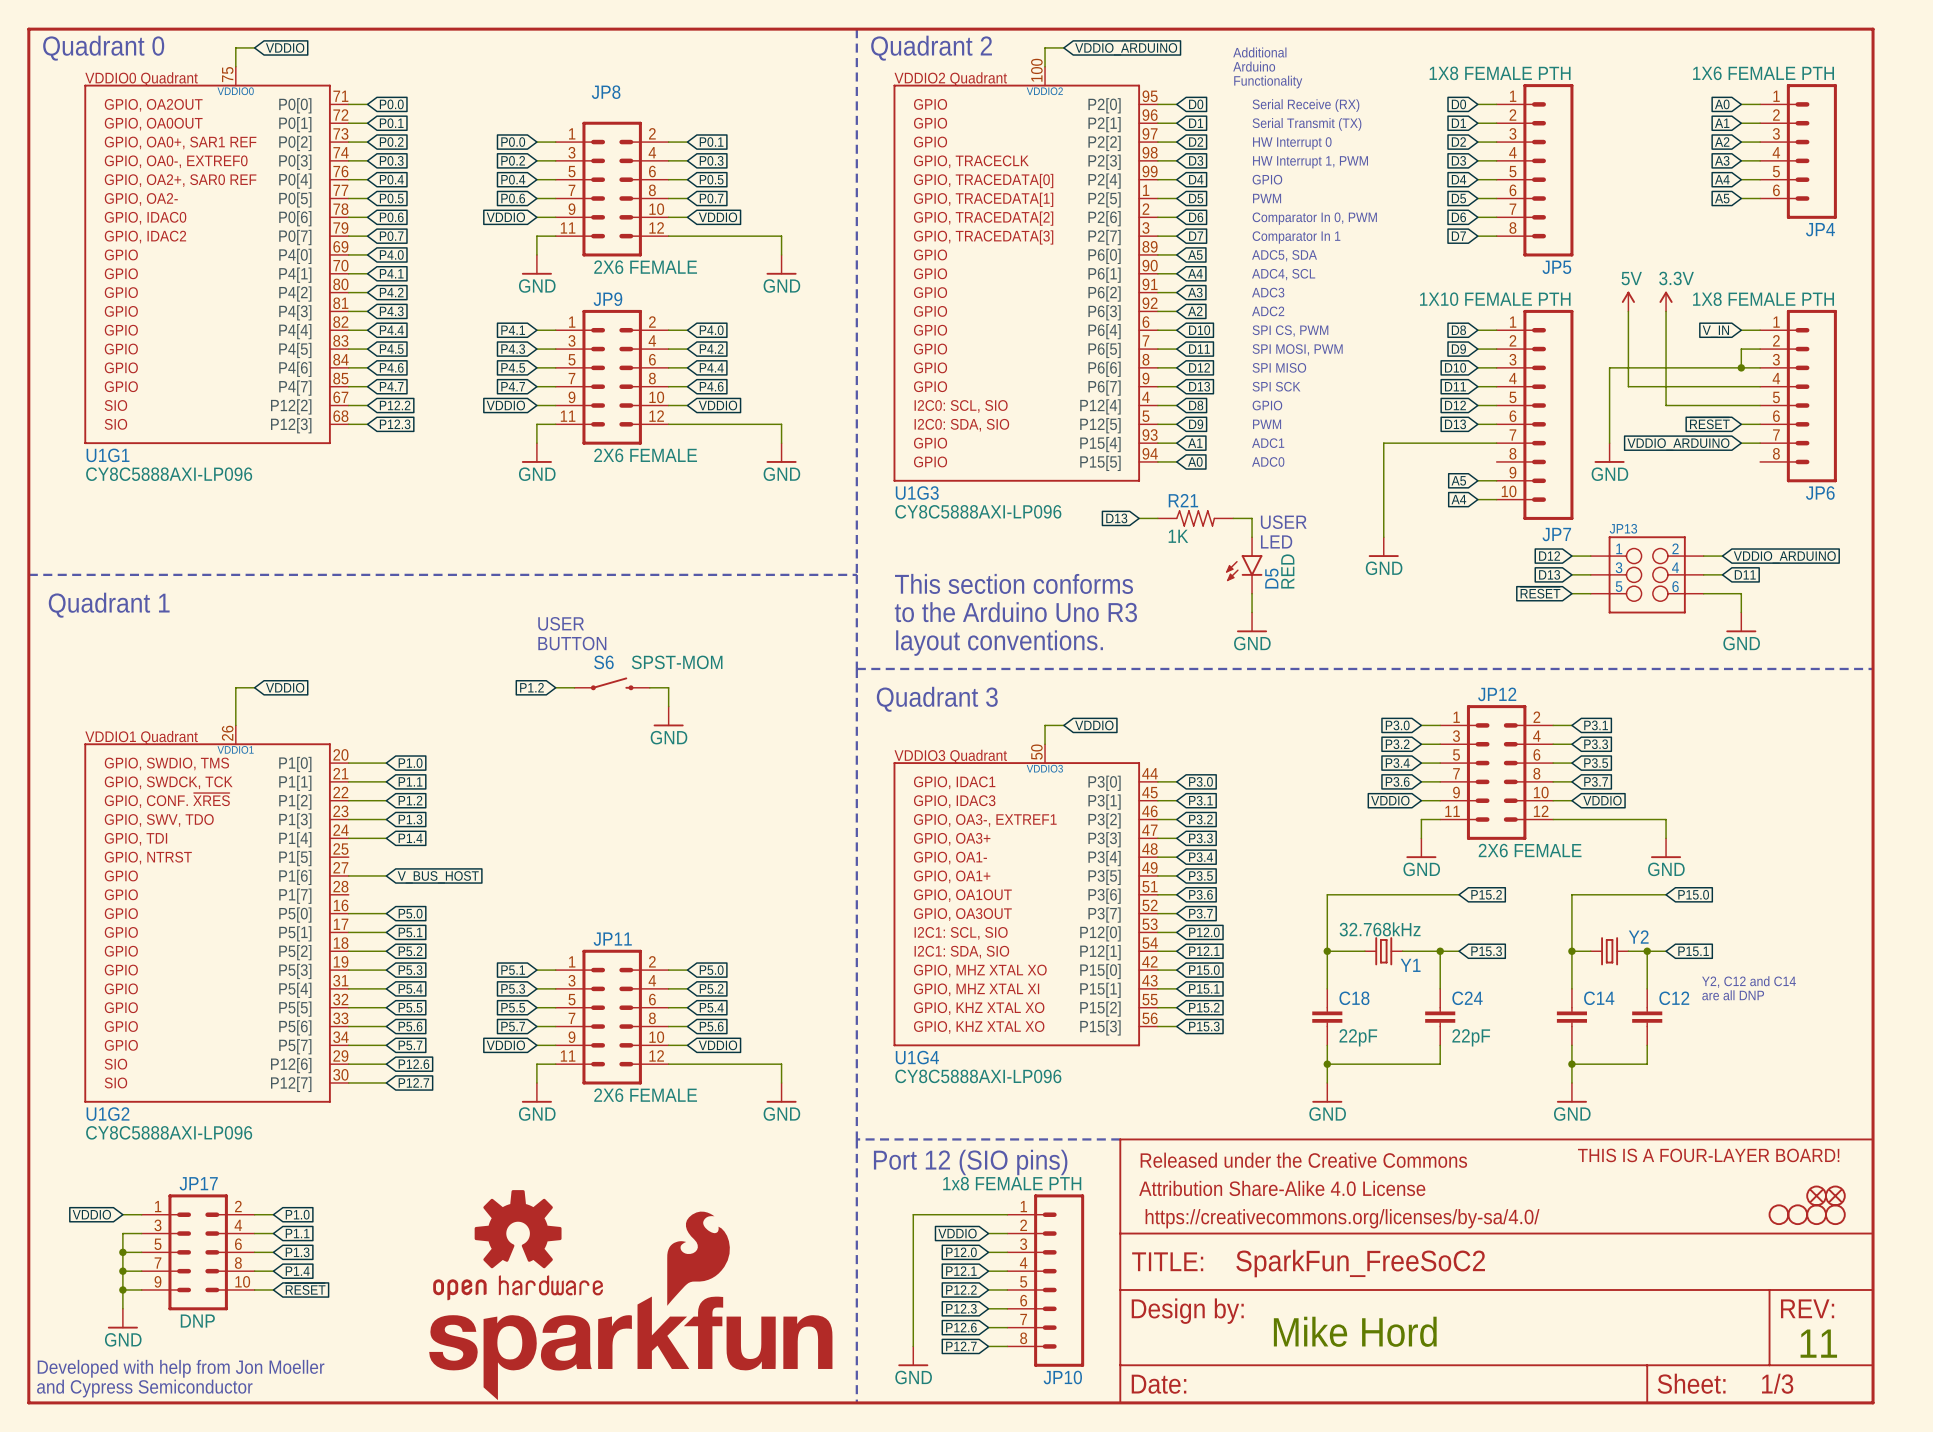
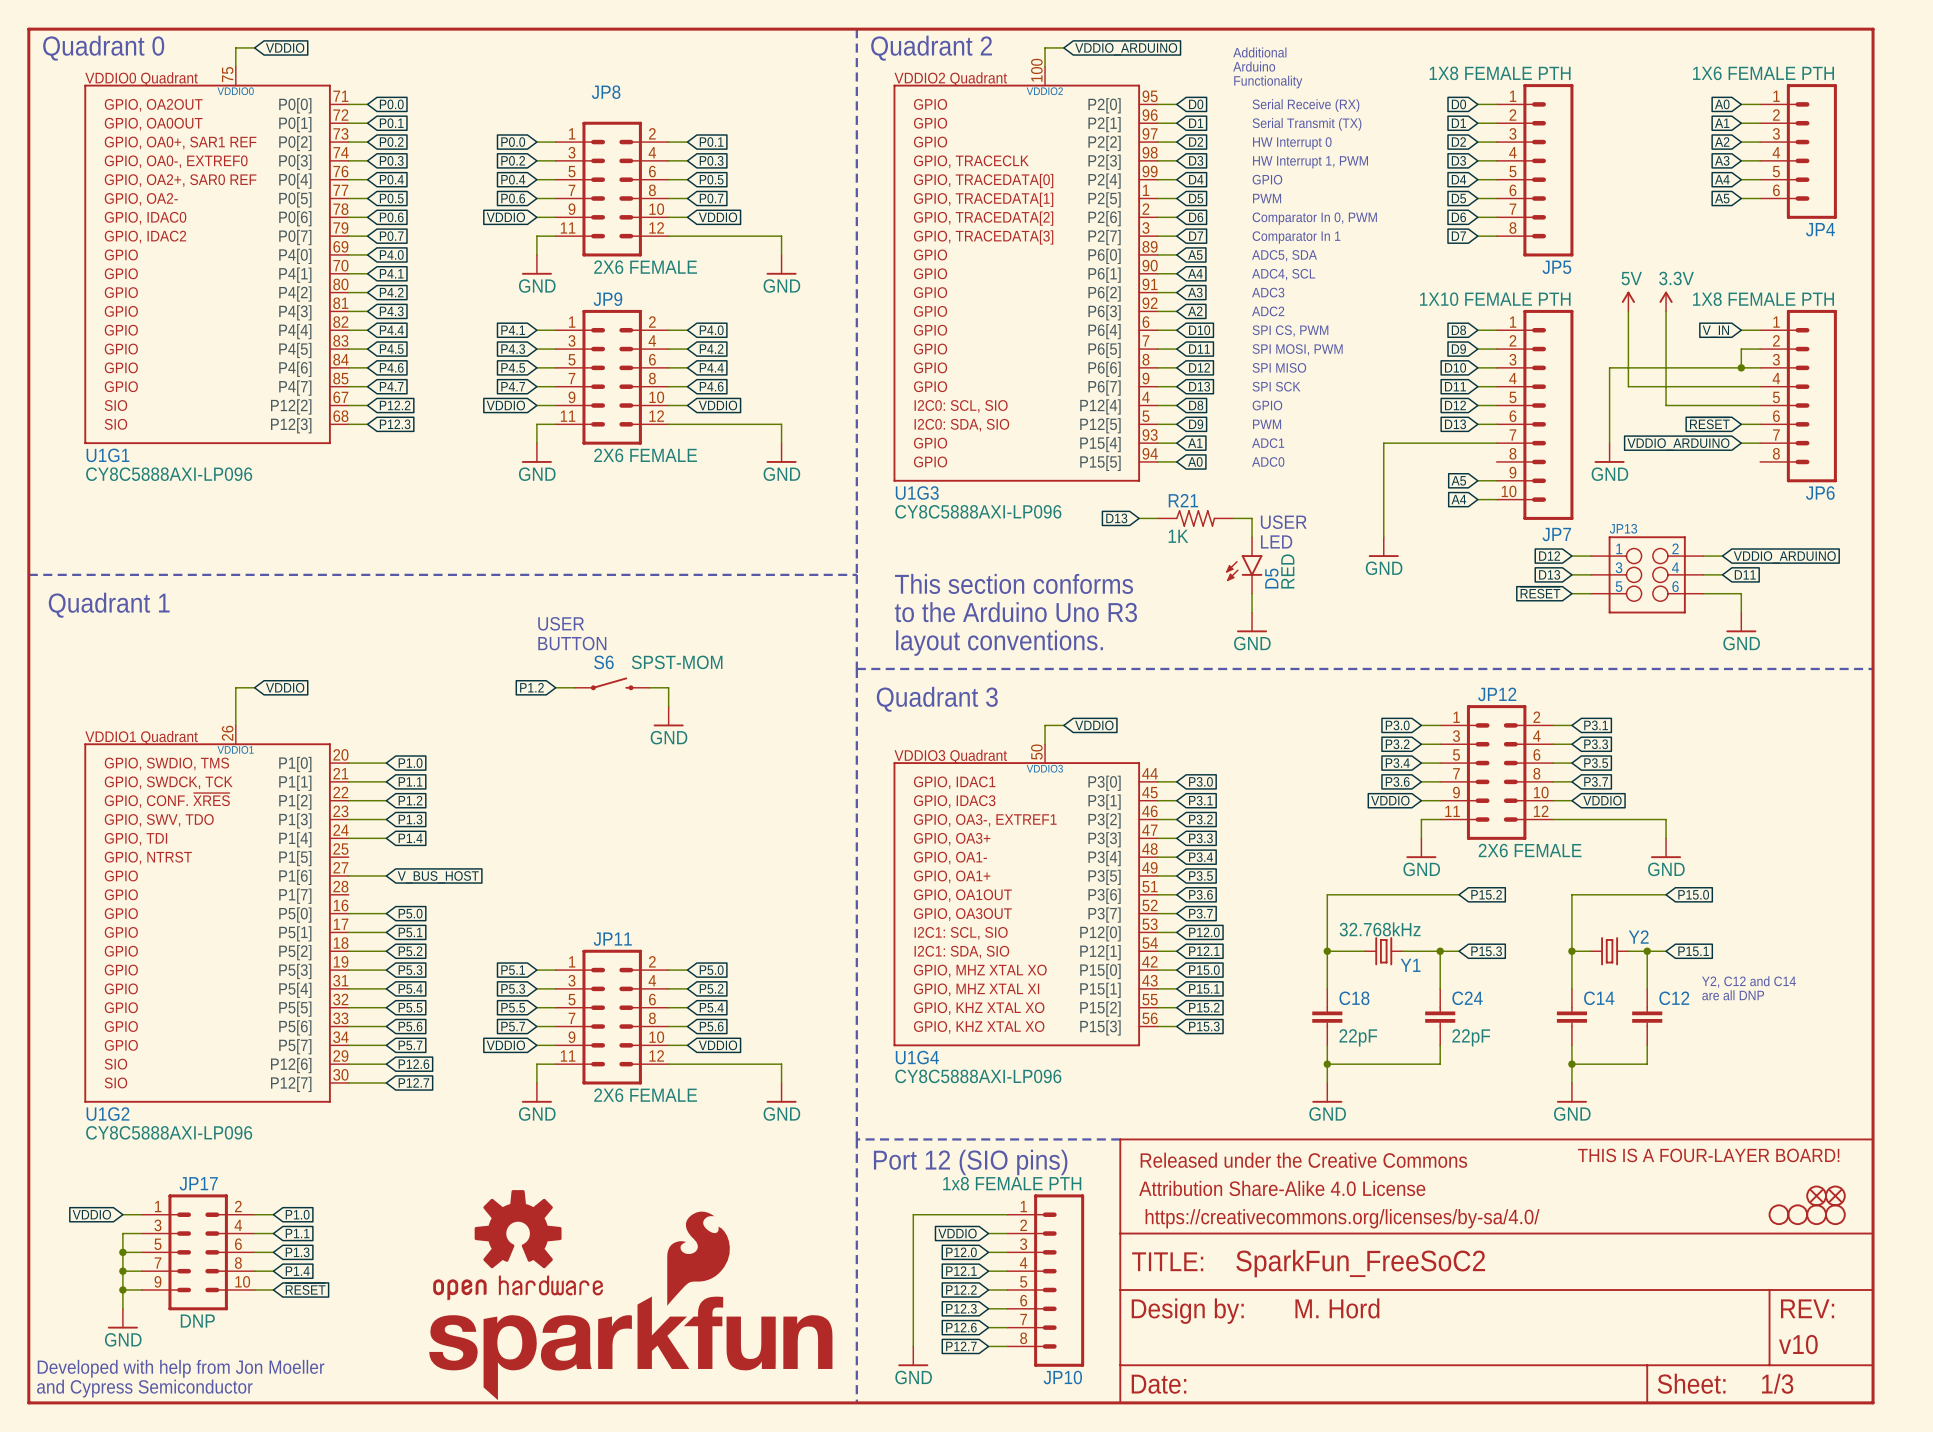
part text: none -> M. Hord (1337, 1308)
text: Mike Hord (1355, 1331) -> none
text: 11 (1818, 1343) -> none
part text: none -> v10 (1798, 1344)

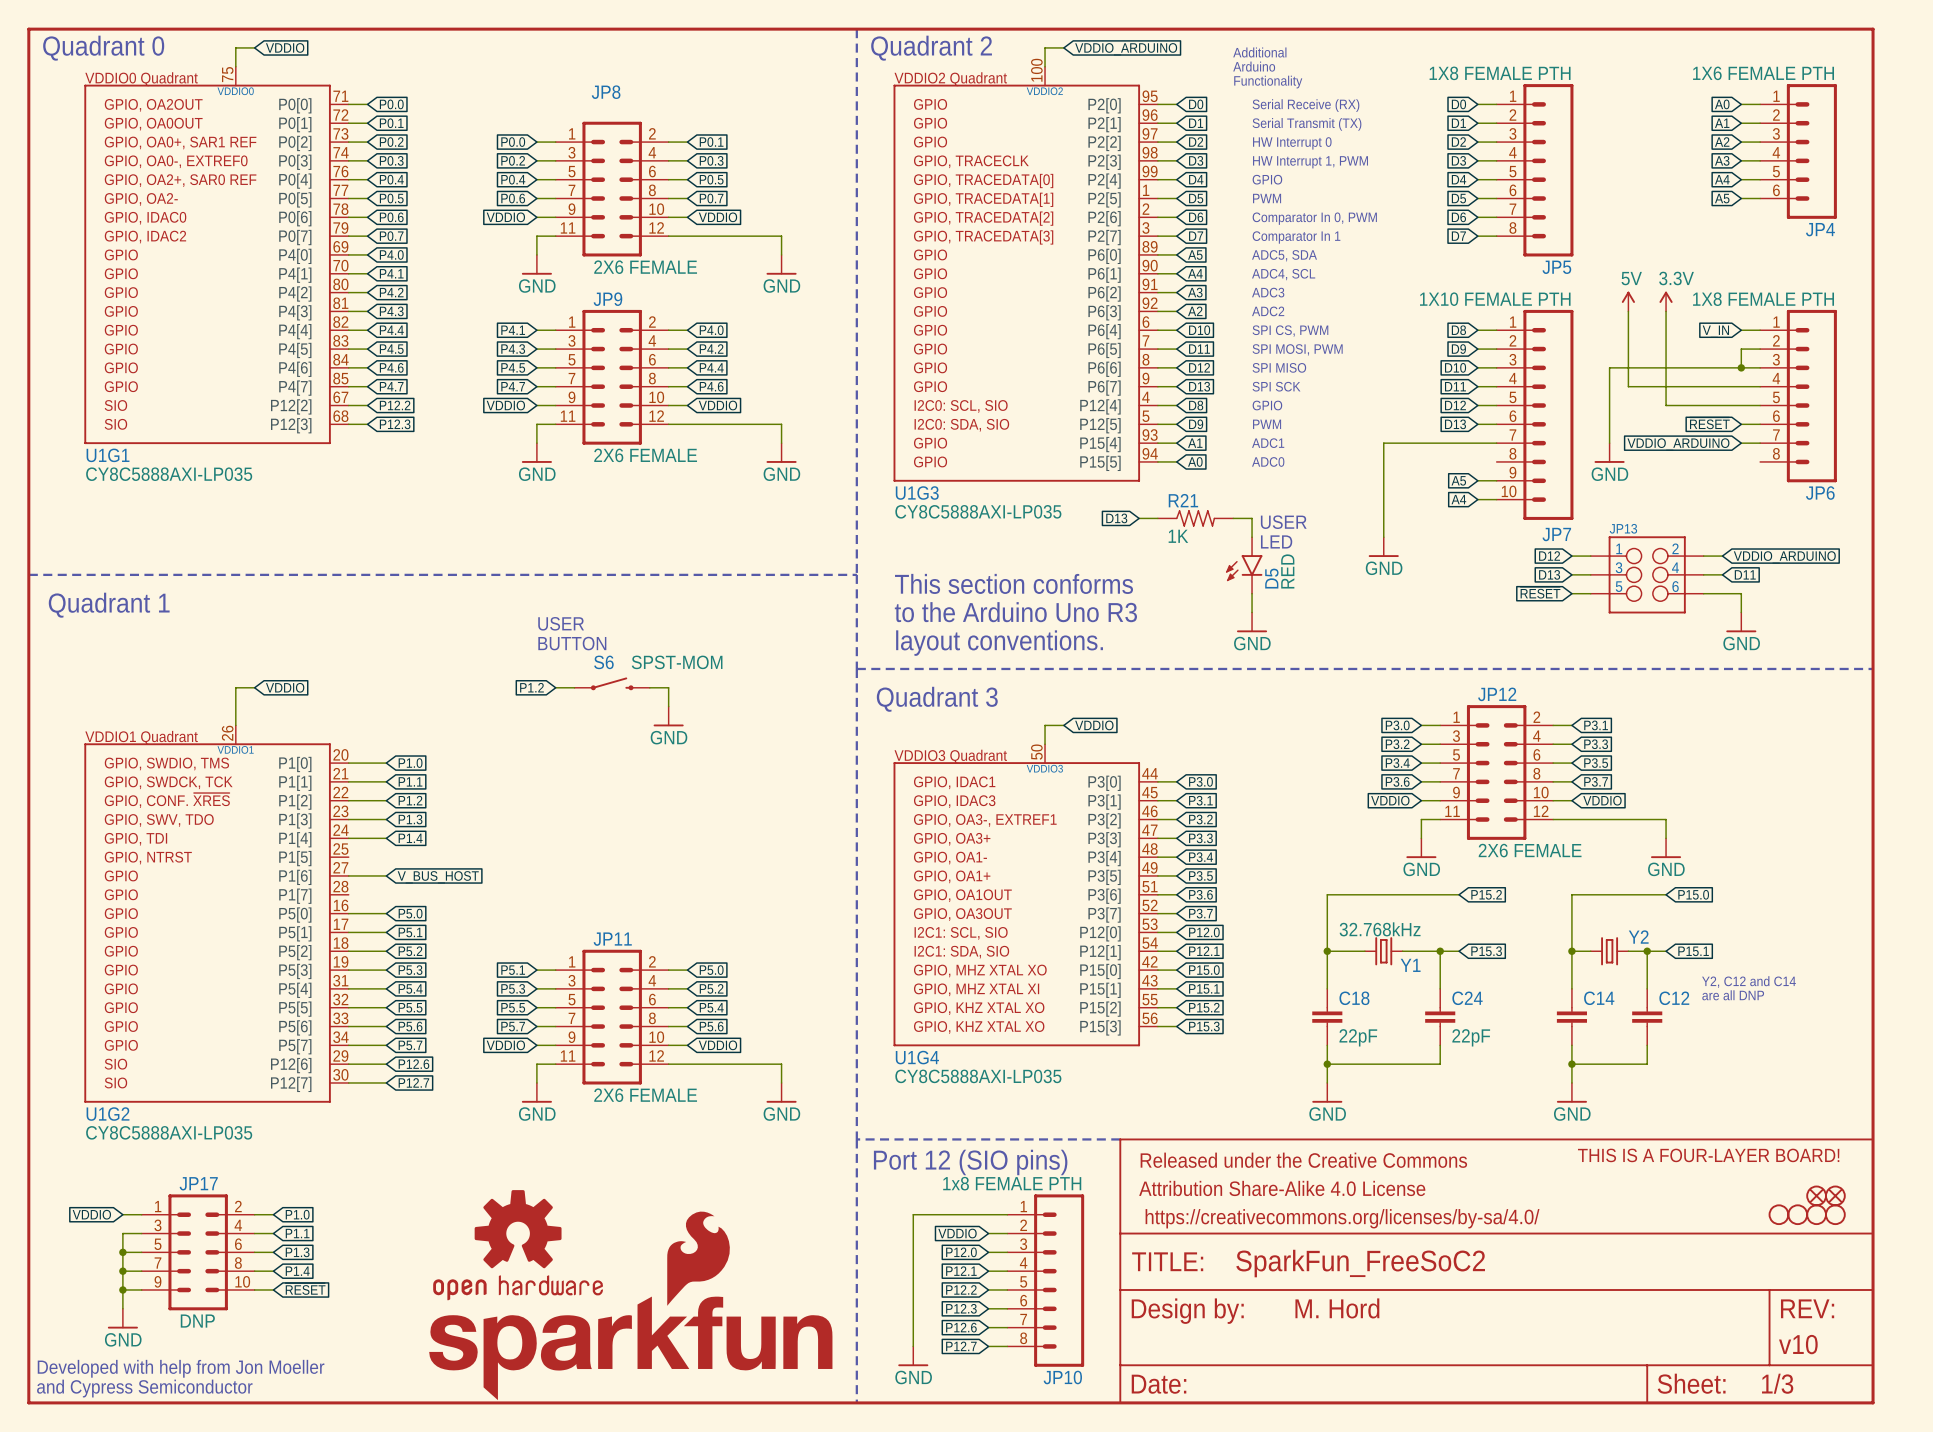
U1G1 value: CY8C5888AXI-LP096 (169, 474) -> CY8C5888AXI-LP035 (169, 474)
U1G3 value: CY8C5888AXI-LP096 (978, 511) -> CY8C5888AXI-LP035 (978, 511)
U1G4 value: CY8C5888AXI-LP096 (978, 1076) -> CY8C5888AXI-LP035 (978, 1076)
U1G2 value: CY8C5888AXI-LP096 (169, 1132) -> CY8C5888AXI-LP035 (169, 1132)

